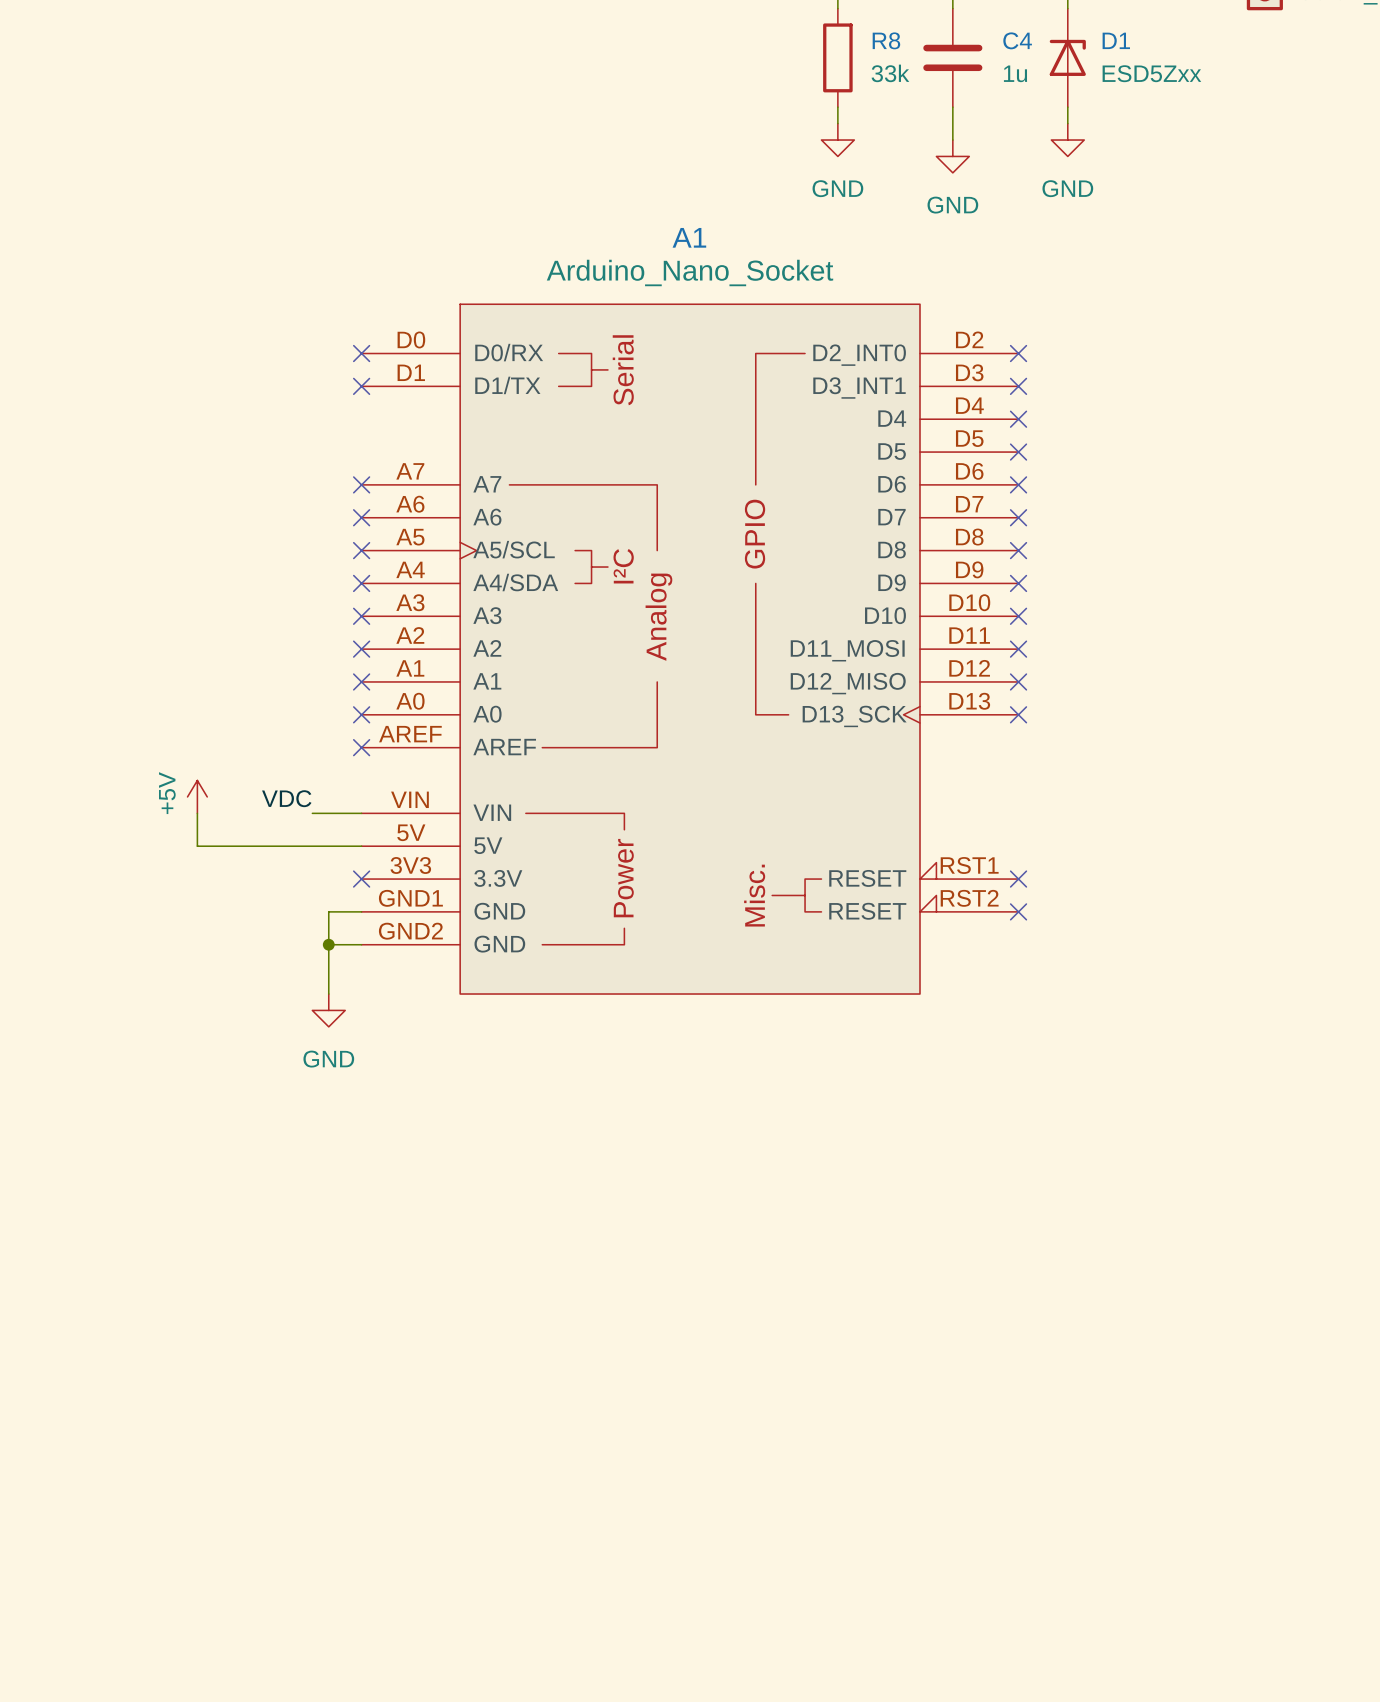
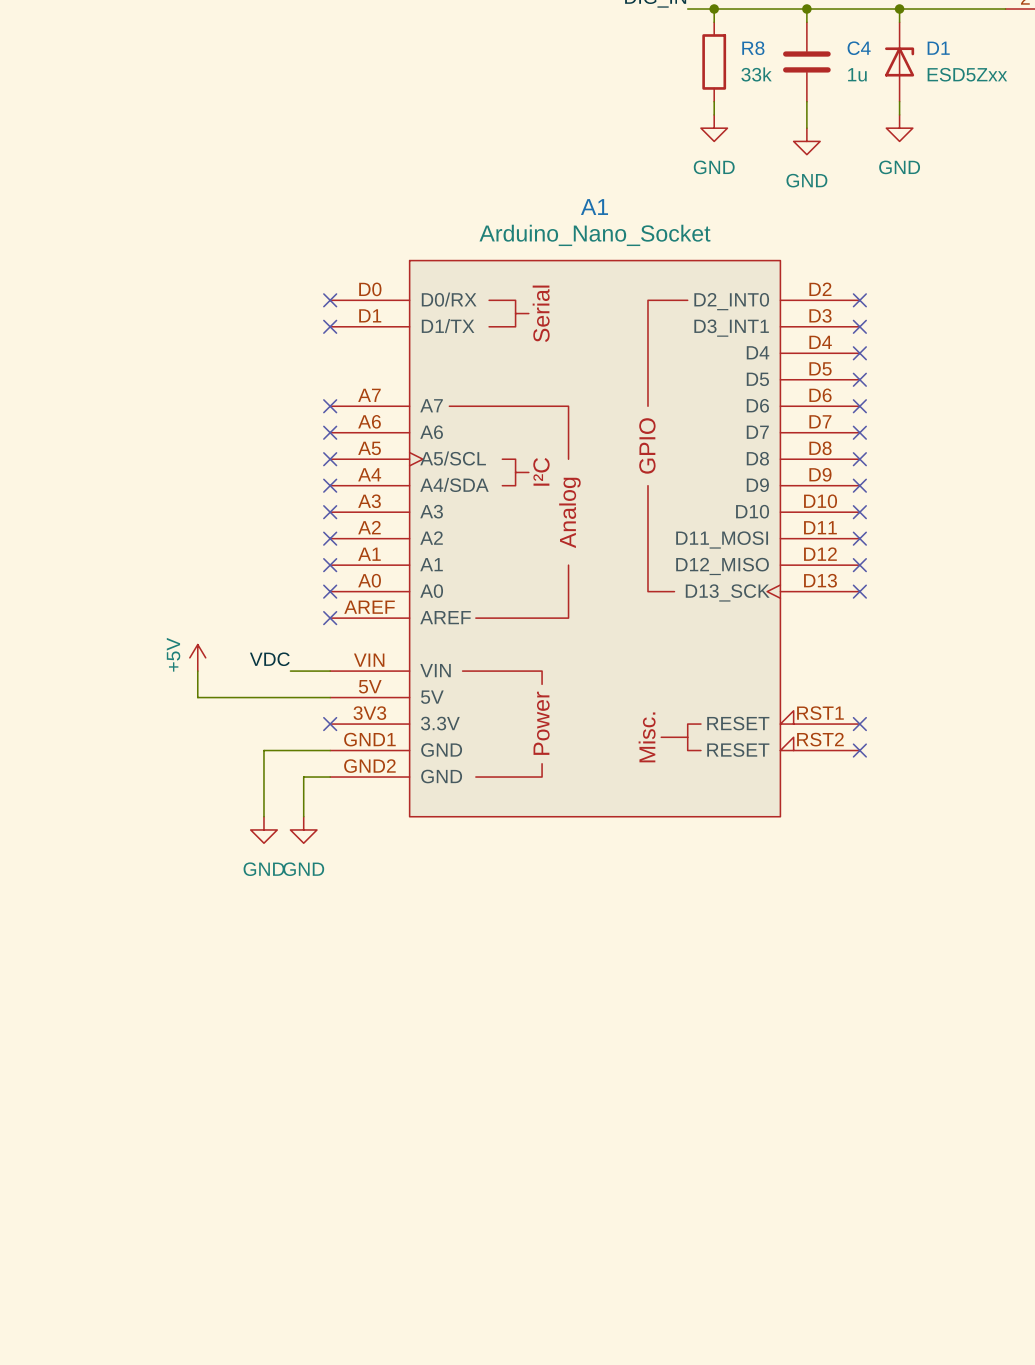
wire: (328, 911) (328, 944) -> (303, 750) (263, 750) (263, 816)
junction: (328, 944) -> none
power symbol: none -> GND (263, 829)

